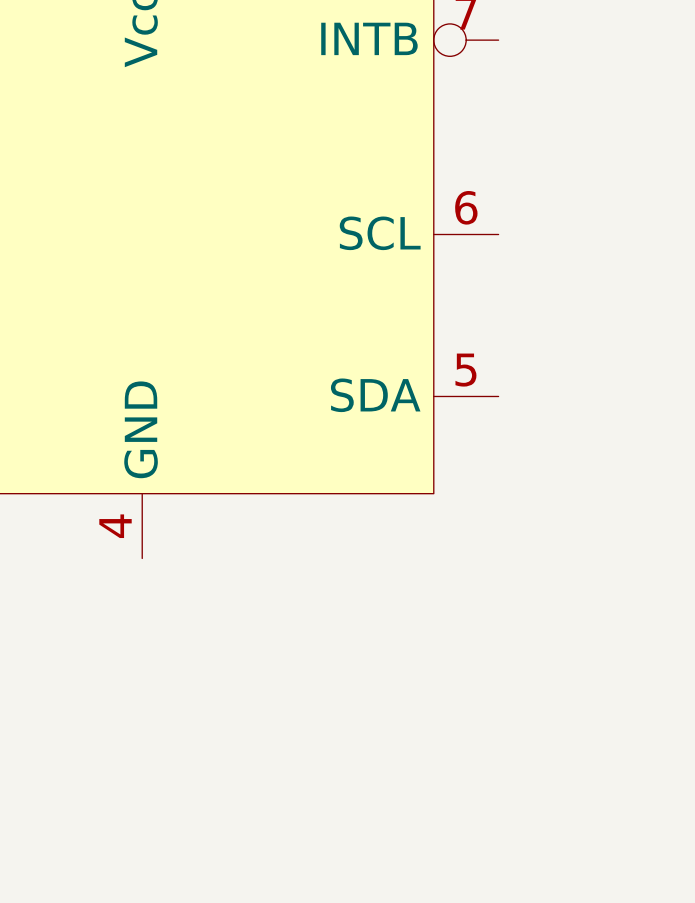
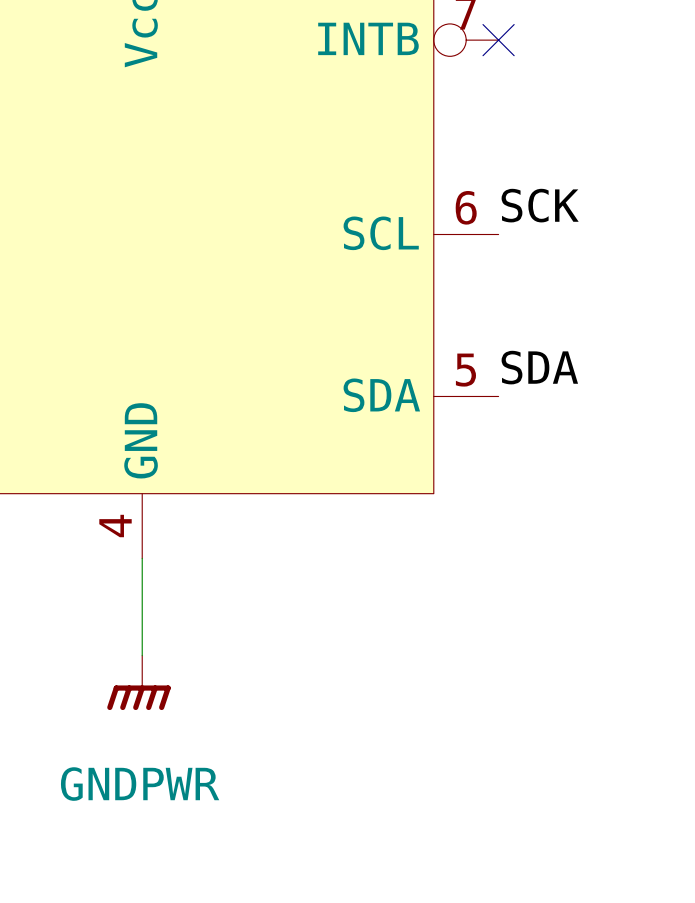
no-connect mark: none -> (498, 40)
label: none -> SCK (540, 205)
label: none -> SDA (539, 367)
wire: none -> (142, 558) (142, 655)
power symbol: none -> GNDPWR (138, 682)

